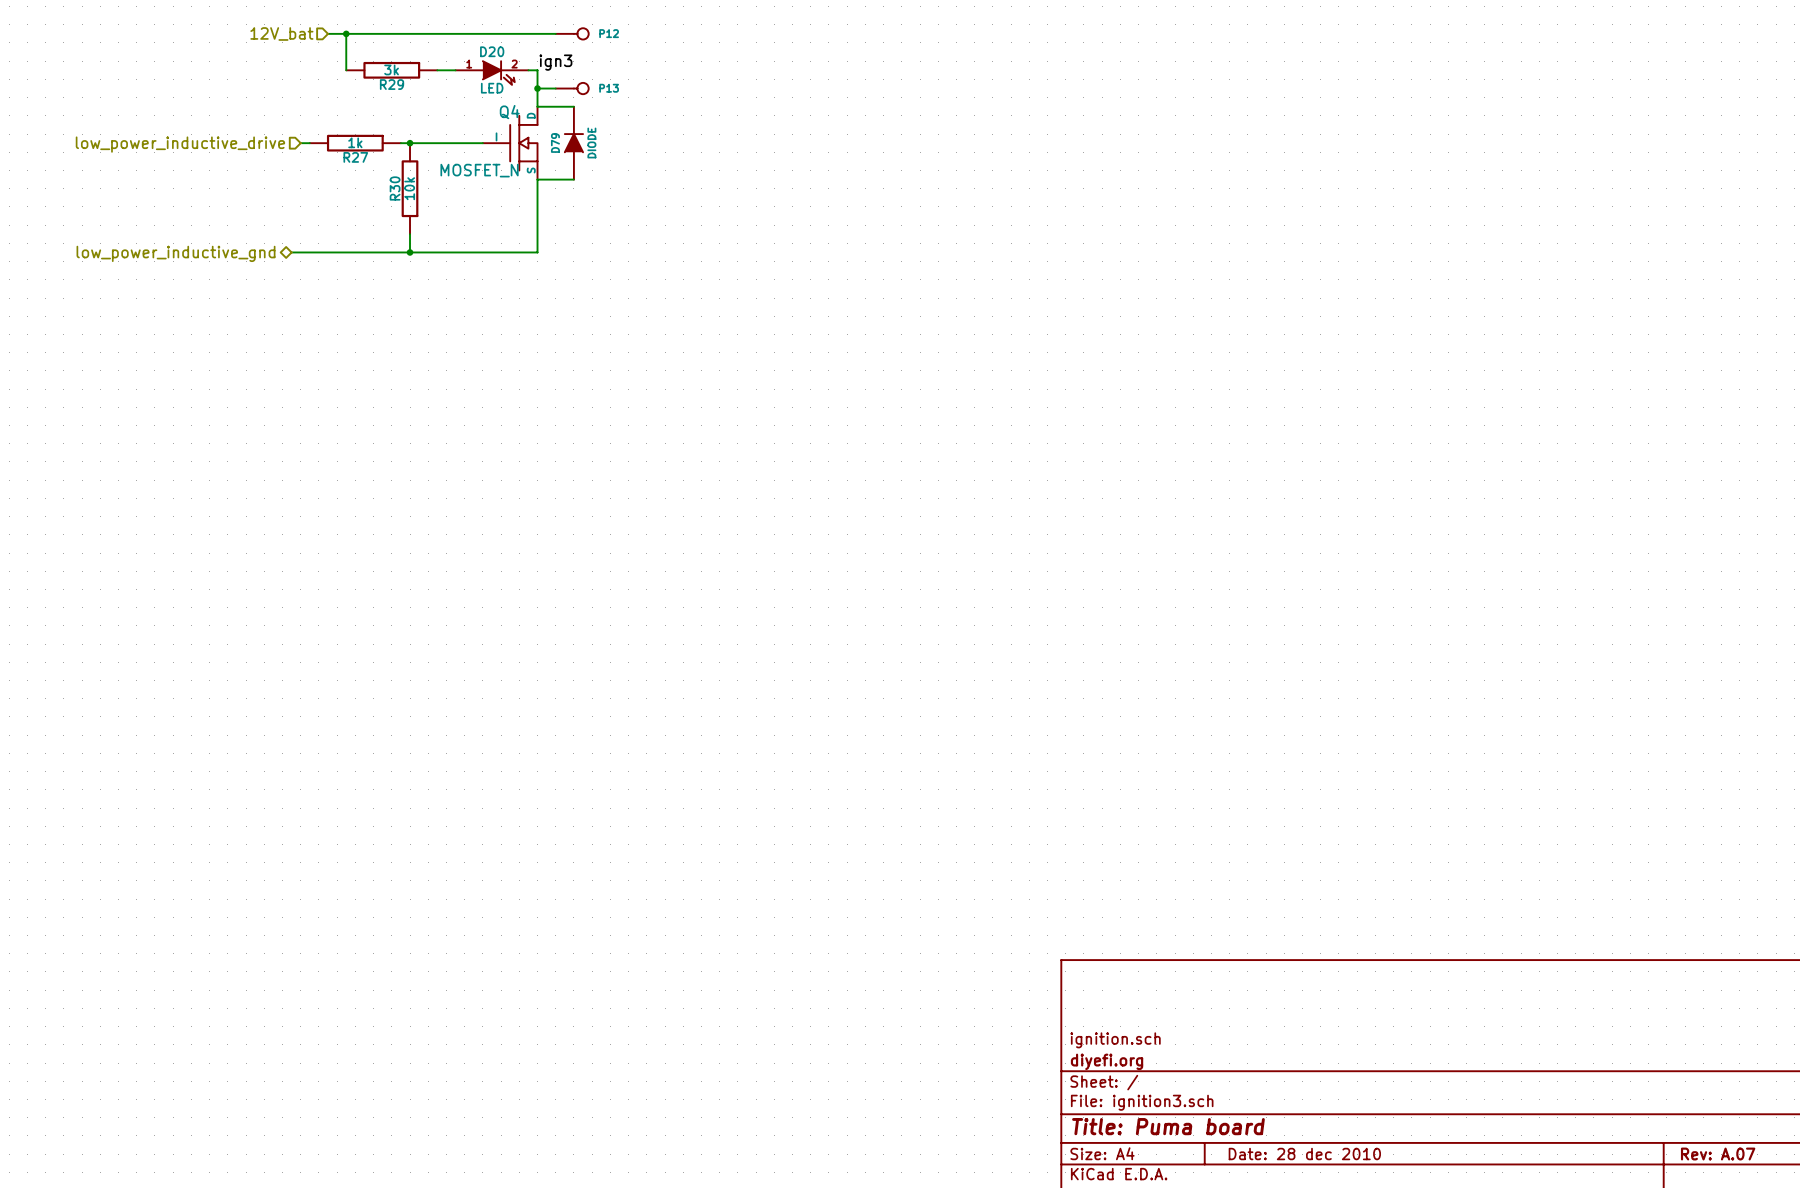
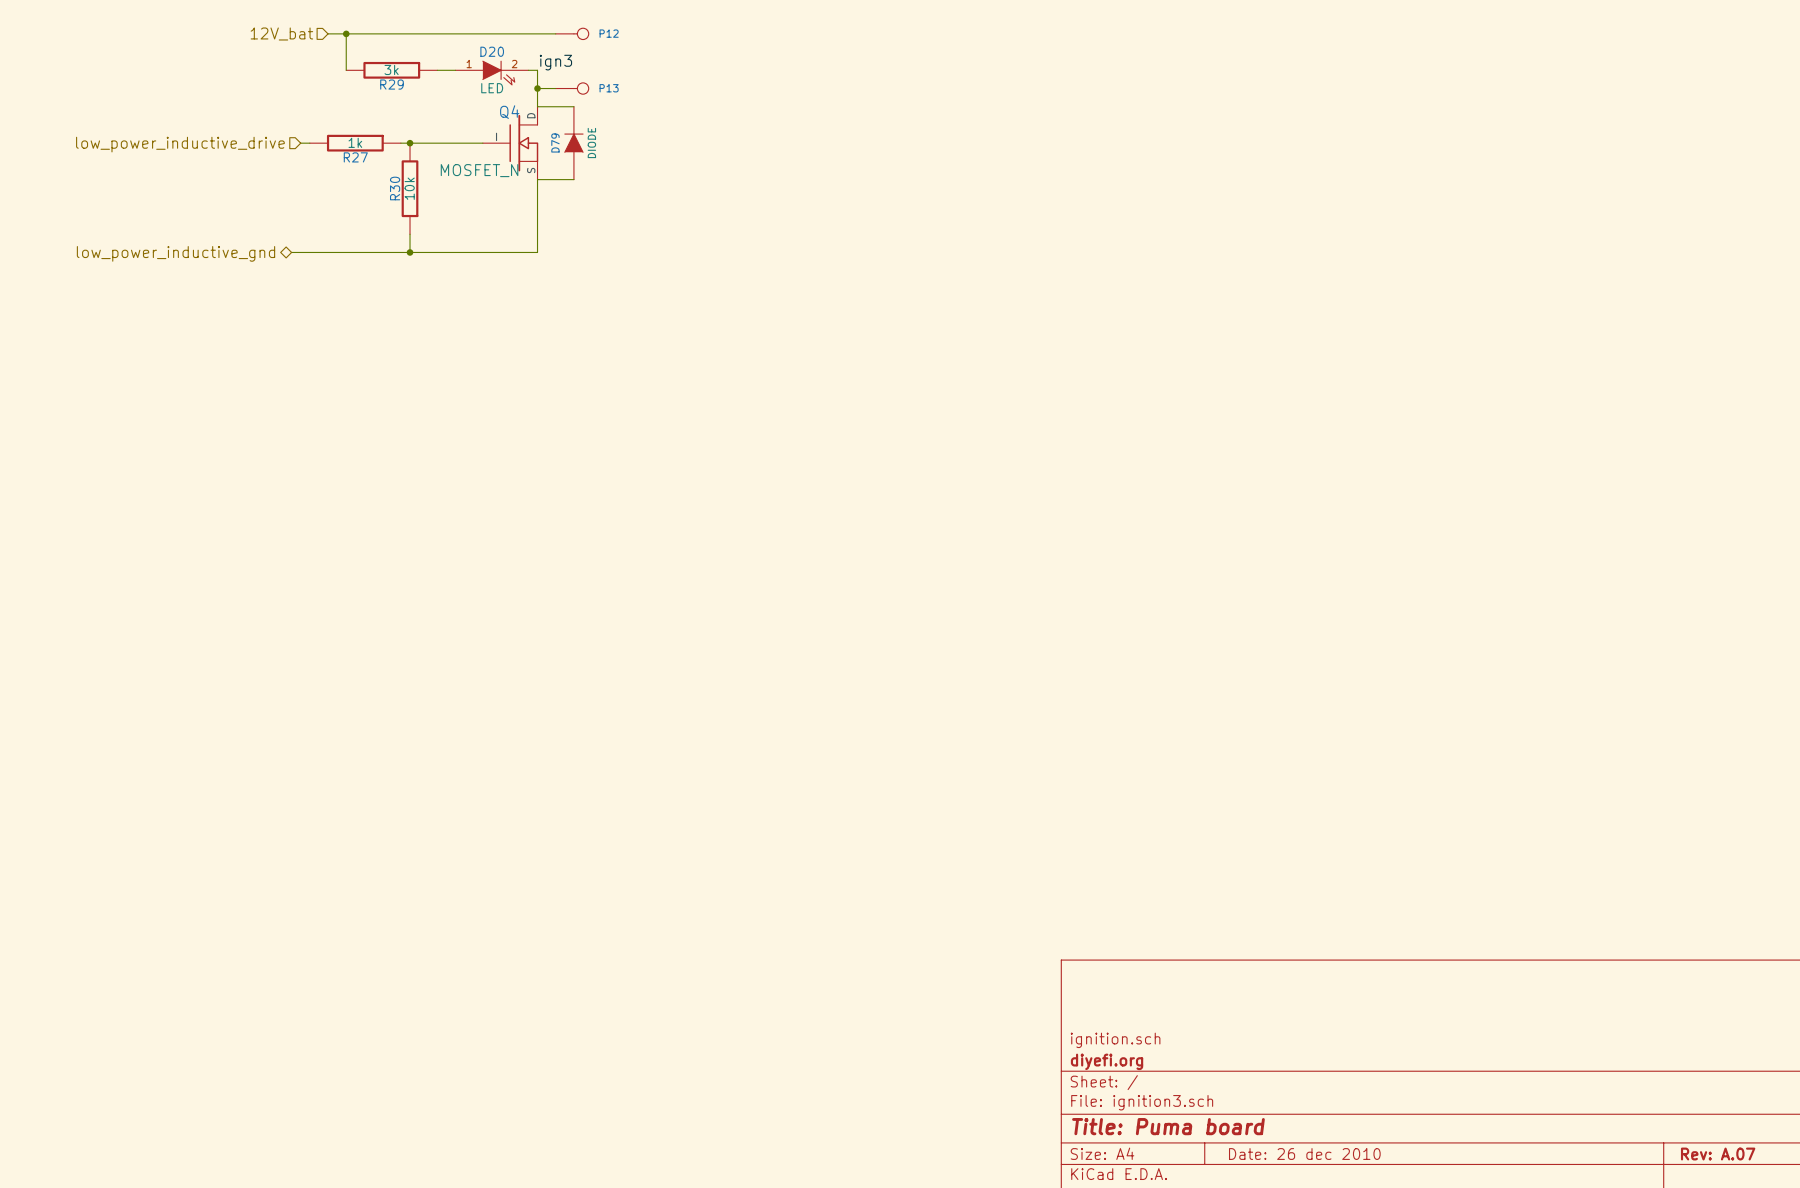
title block: Date: 28 dec 2010 (1304, 1154) -> Date: 26 dec 2010 (1304, 1154)

